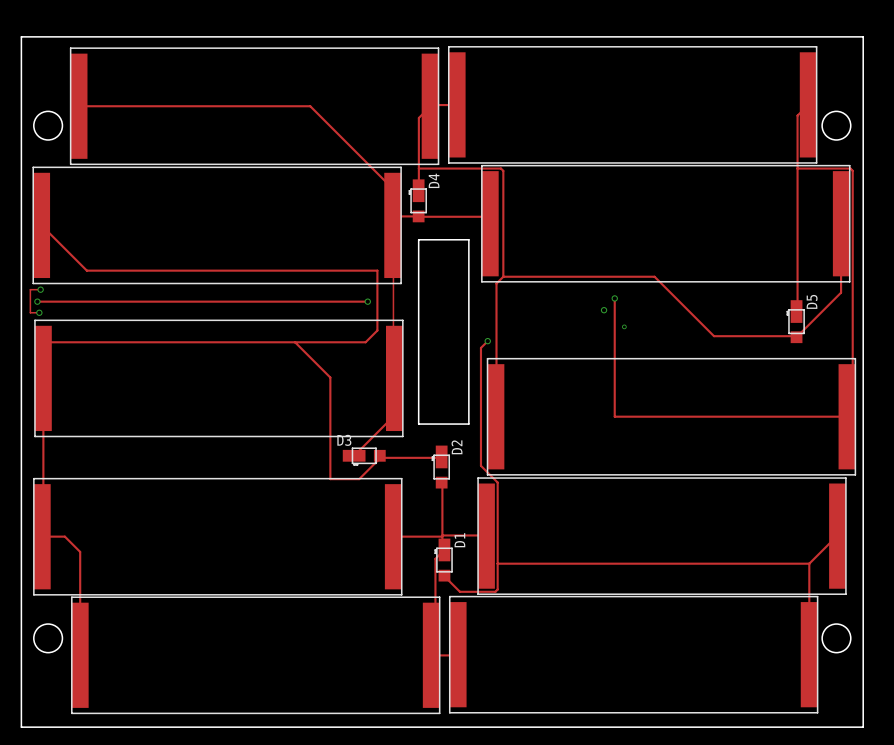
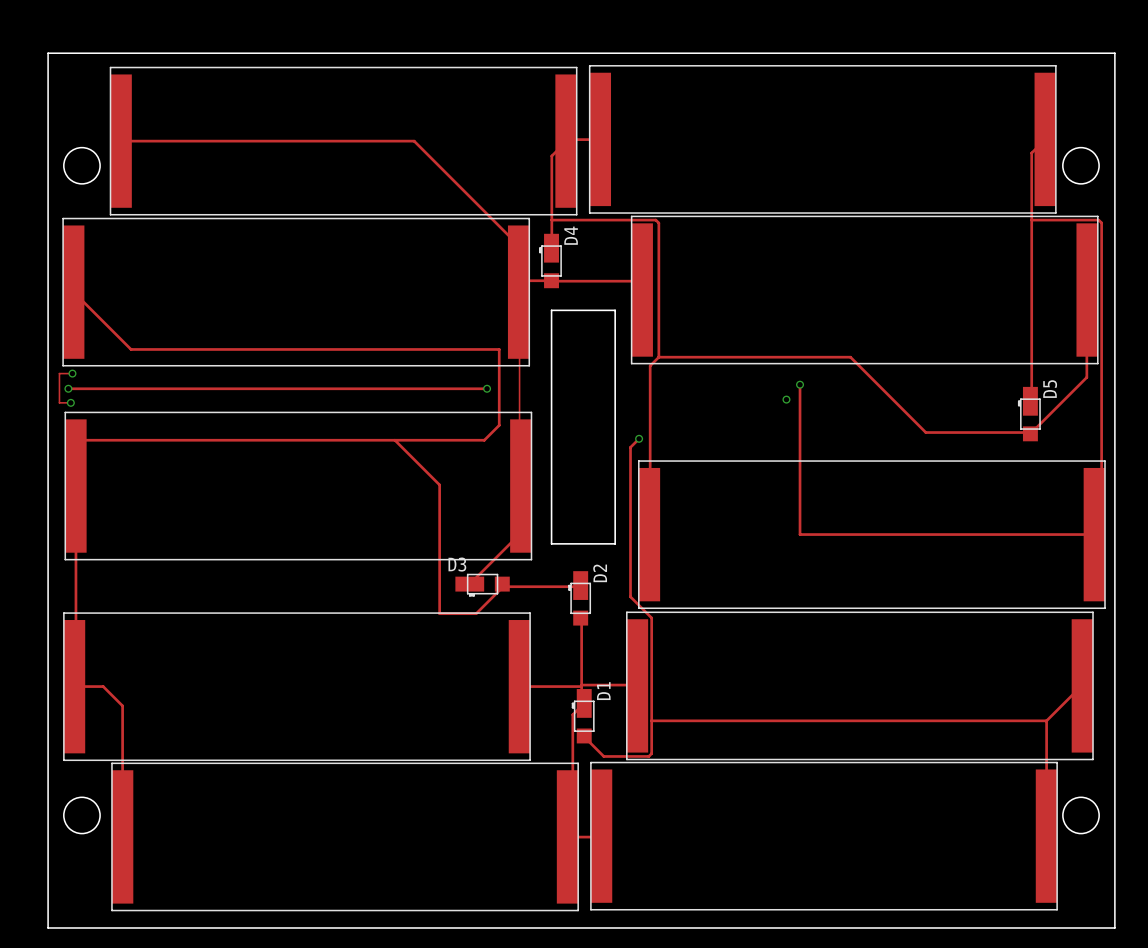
via: (624, 326) -> none

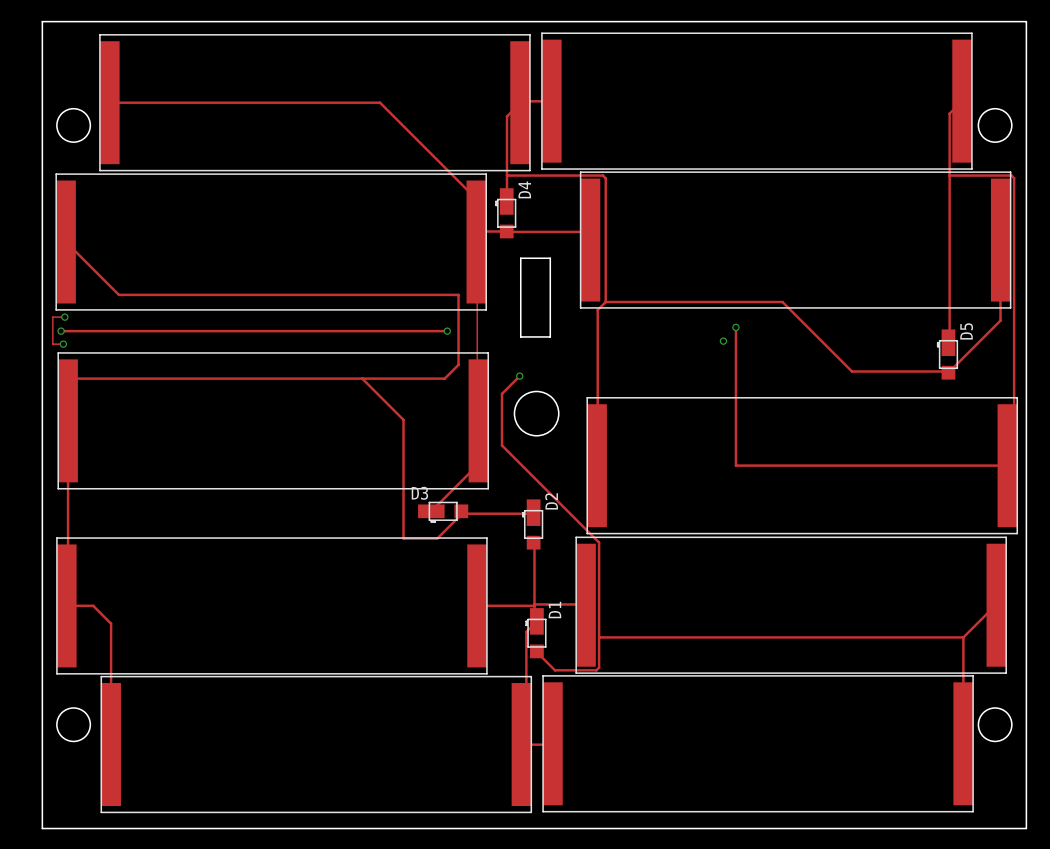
board edge: none -> (520, 258) (550, 258) (550, 336) (520, 336) (520, 258)
board edge: (551, 310) (615, 310) (615, 543) (551, 543) (551, 310) -> none
via: none -> (519, 376)
track: (639, 438) (630, 447) (630, 596) -> (519, 376) (502, 393) (502, 445) (579, 523)
via: (639, 438) -> none
round board edge: none -> [513, 390, 560, 437]

